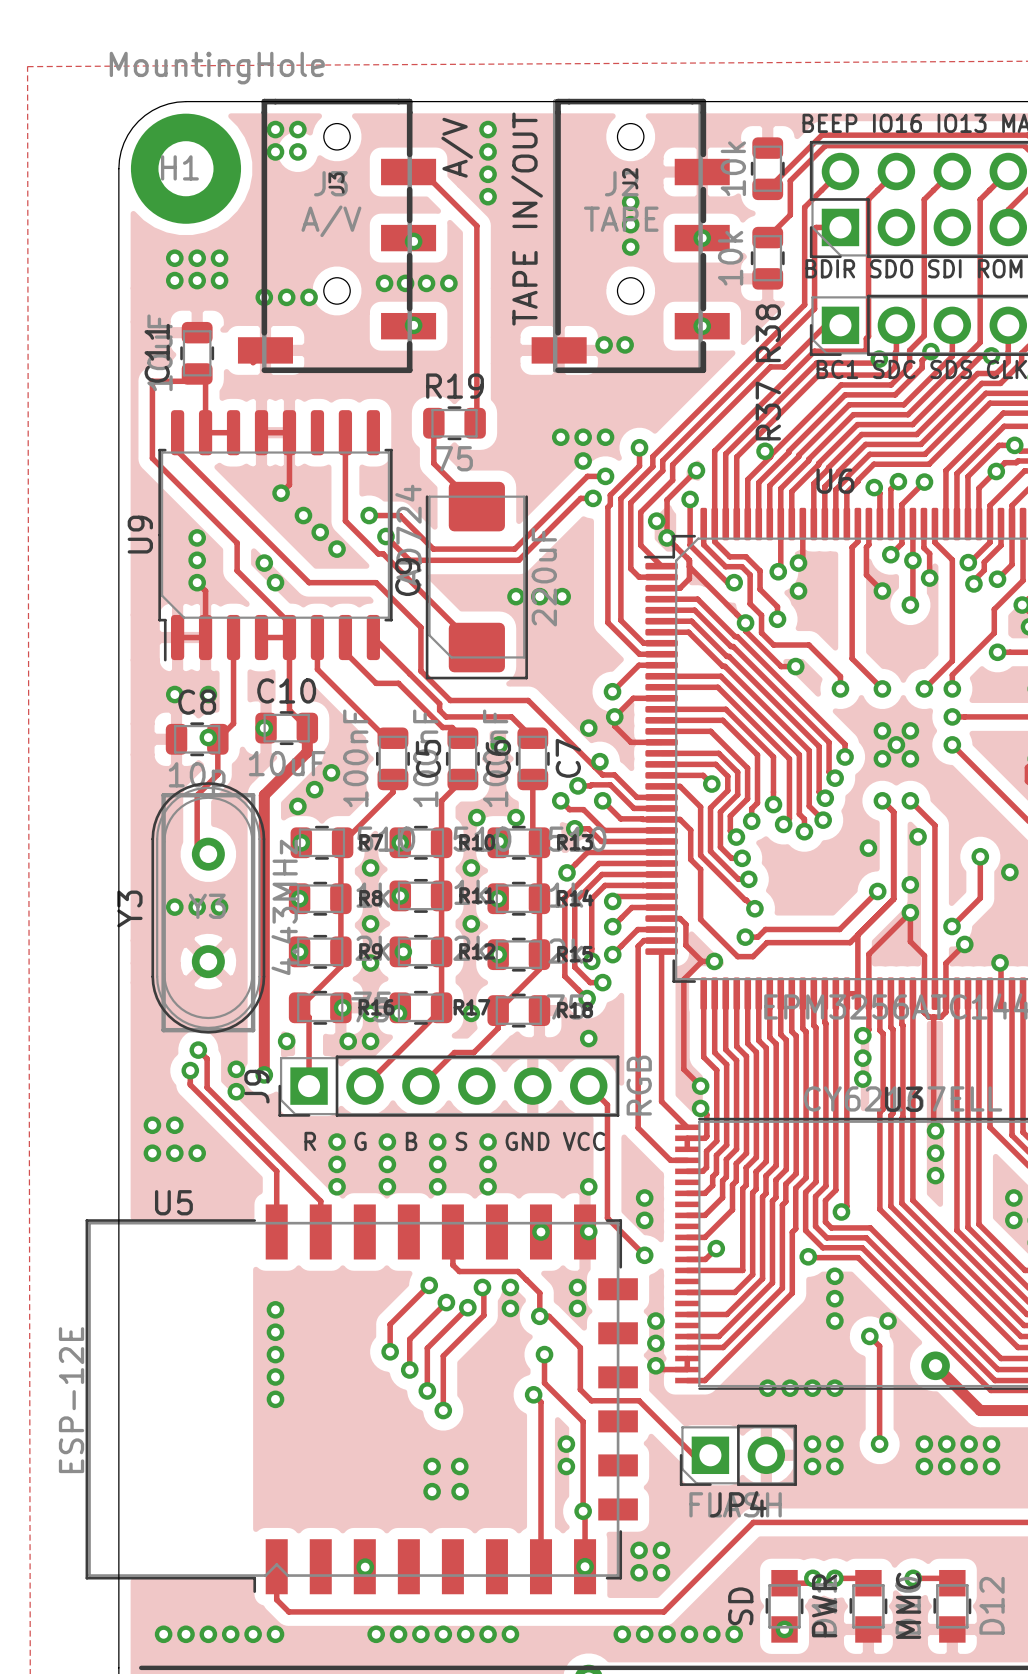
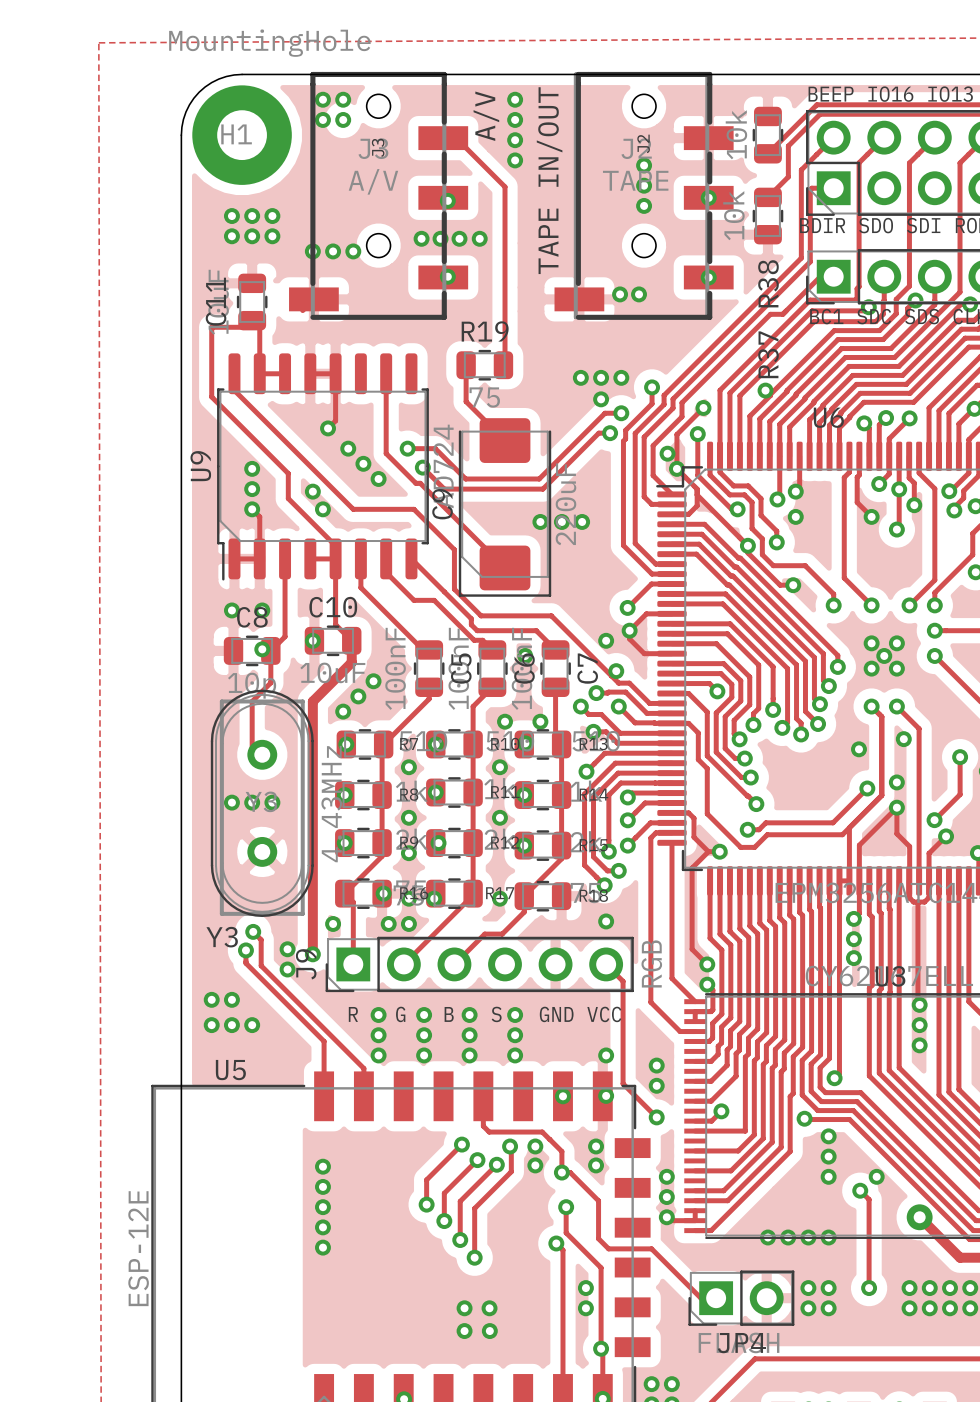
Y3 name rotation: 0° (129, 908) -> 90° clockwise (222, 937)
Y3 name position: Y3 (129, 908) -> Y3 (222, 937)

